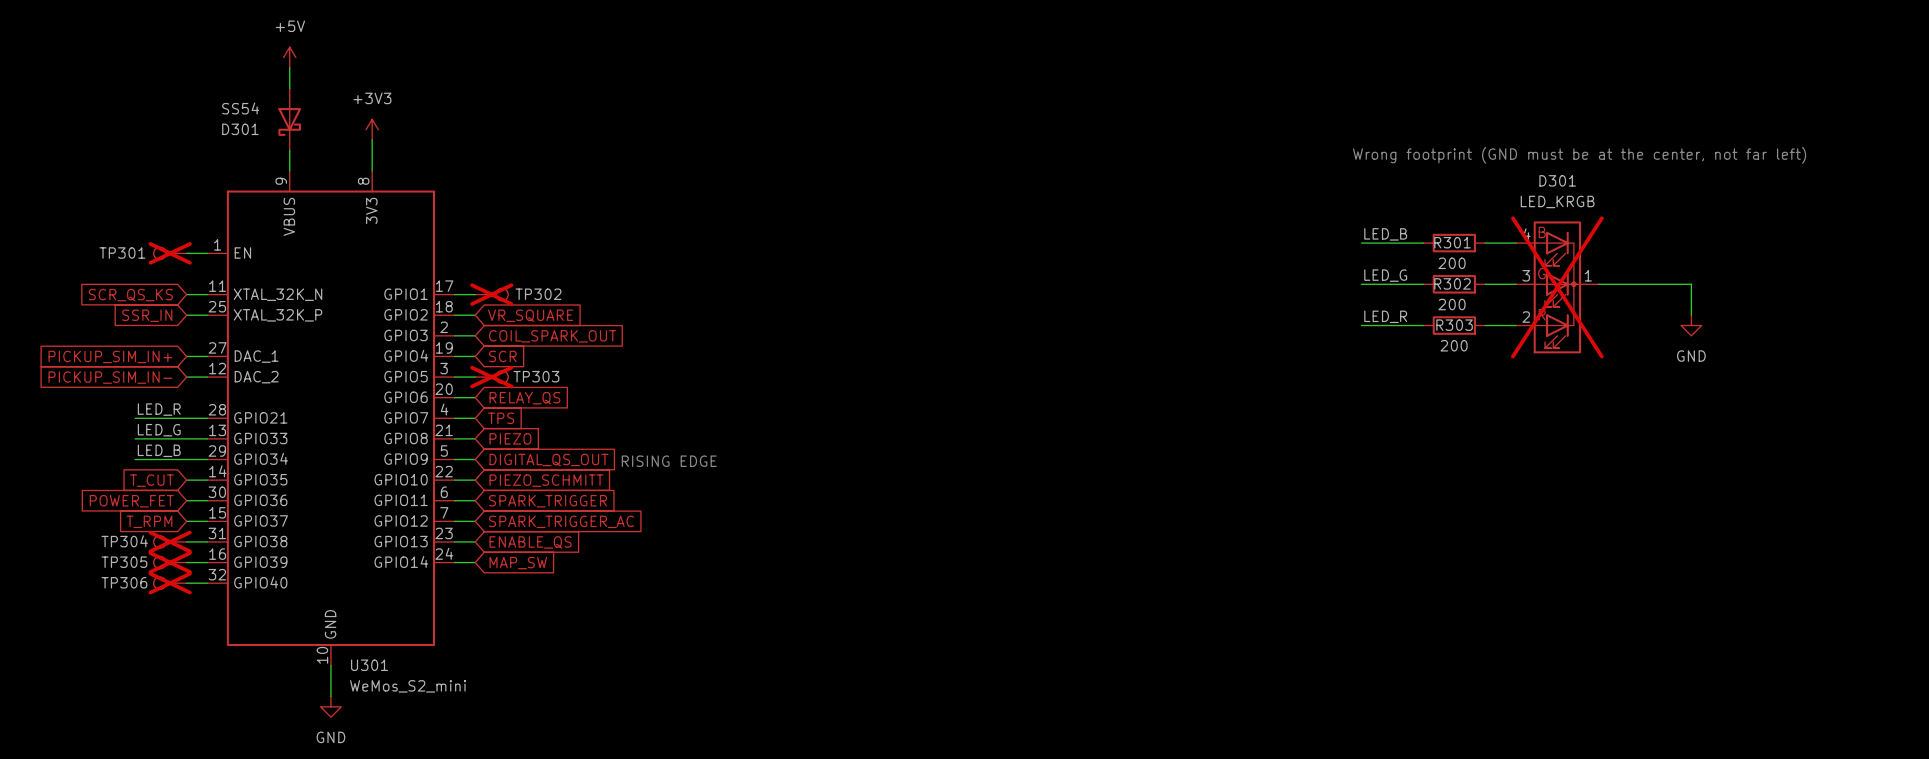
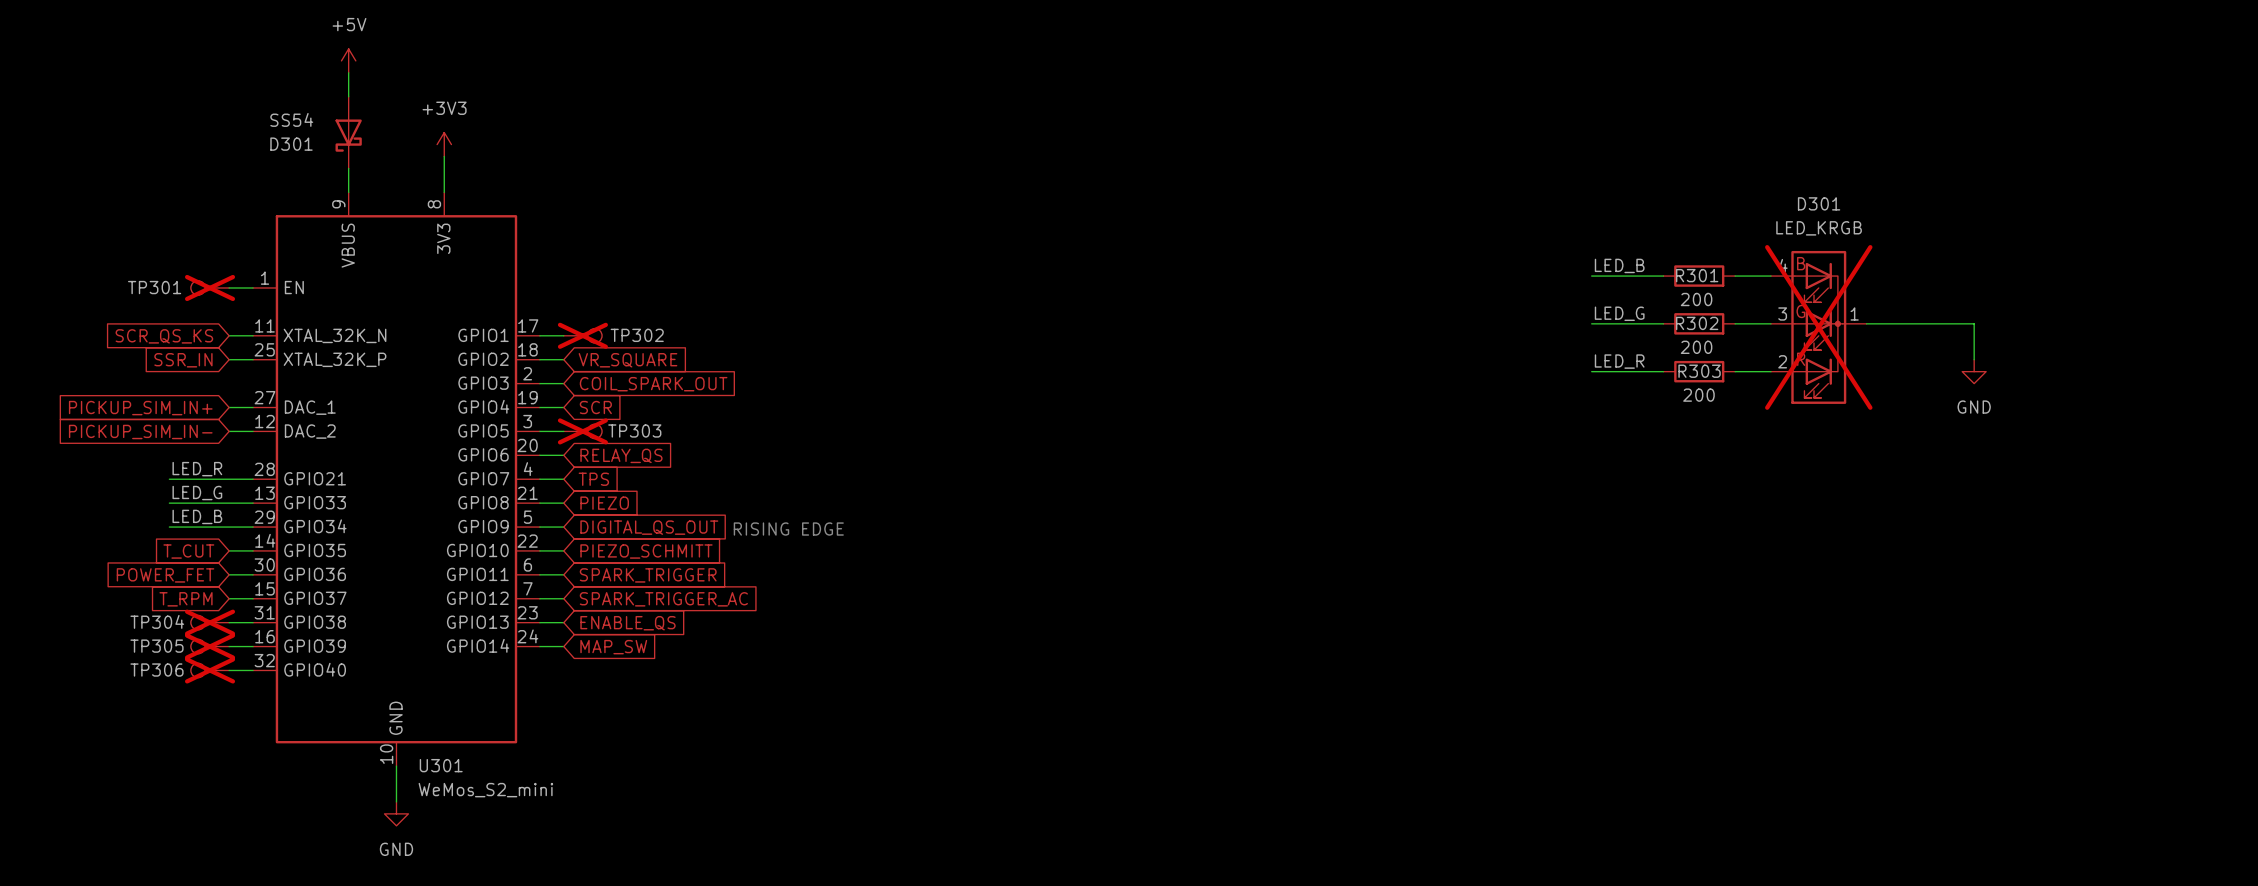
text: Wrong footprint (GND must be at the center, not far left) (1579, 155) -> none

